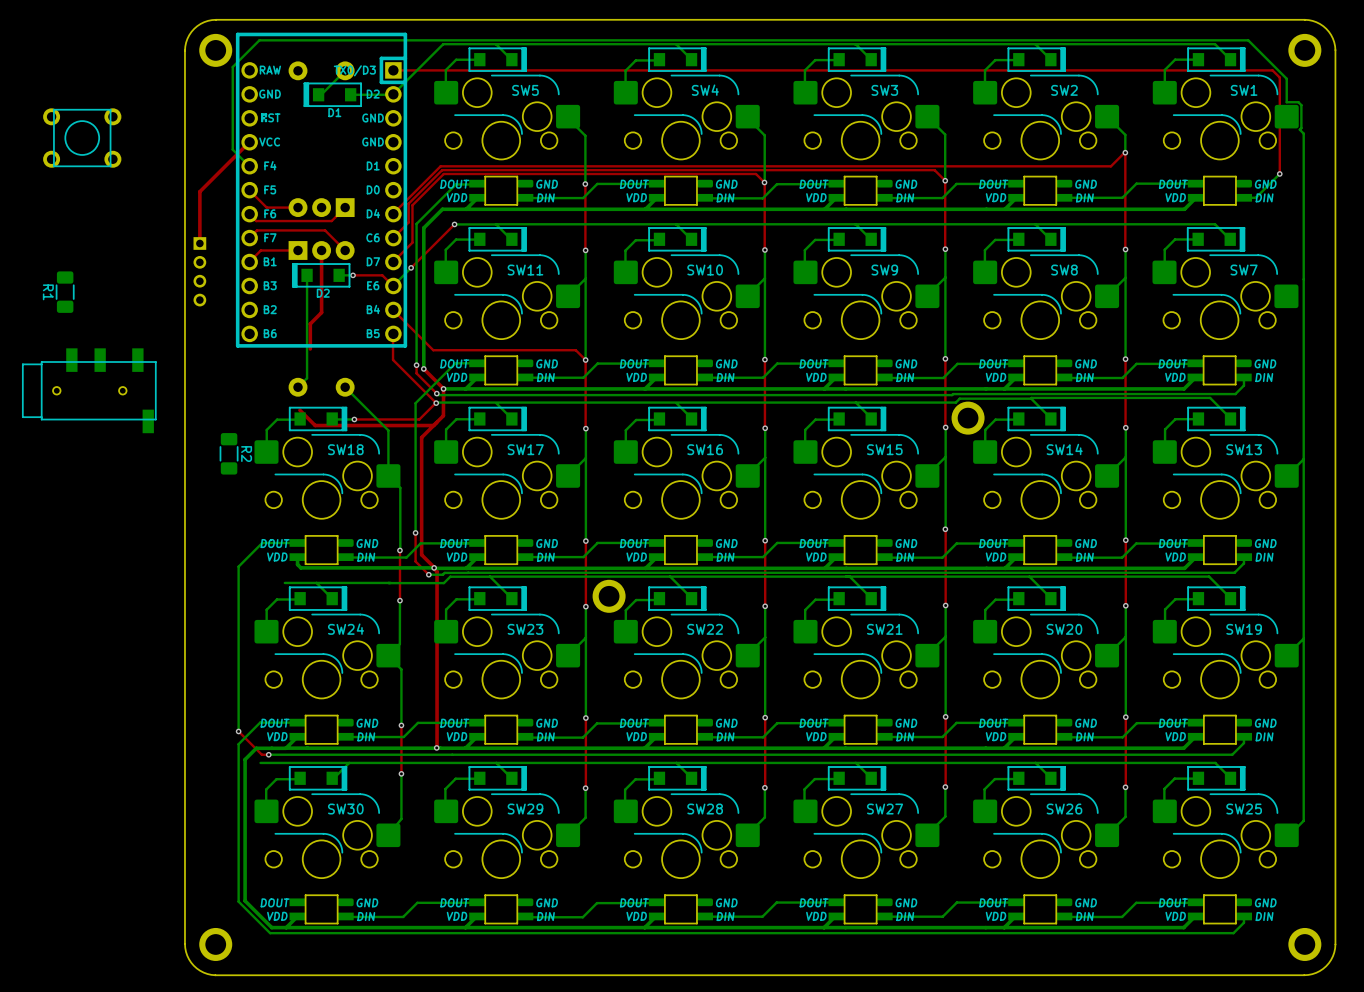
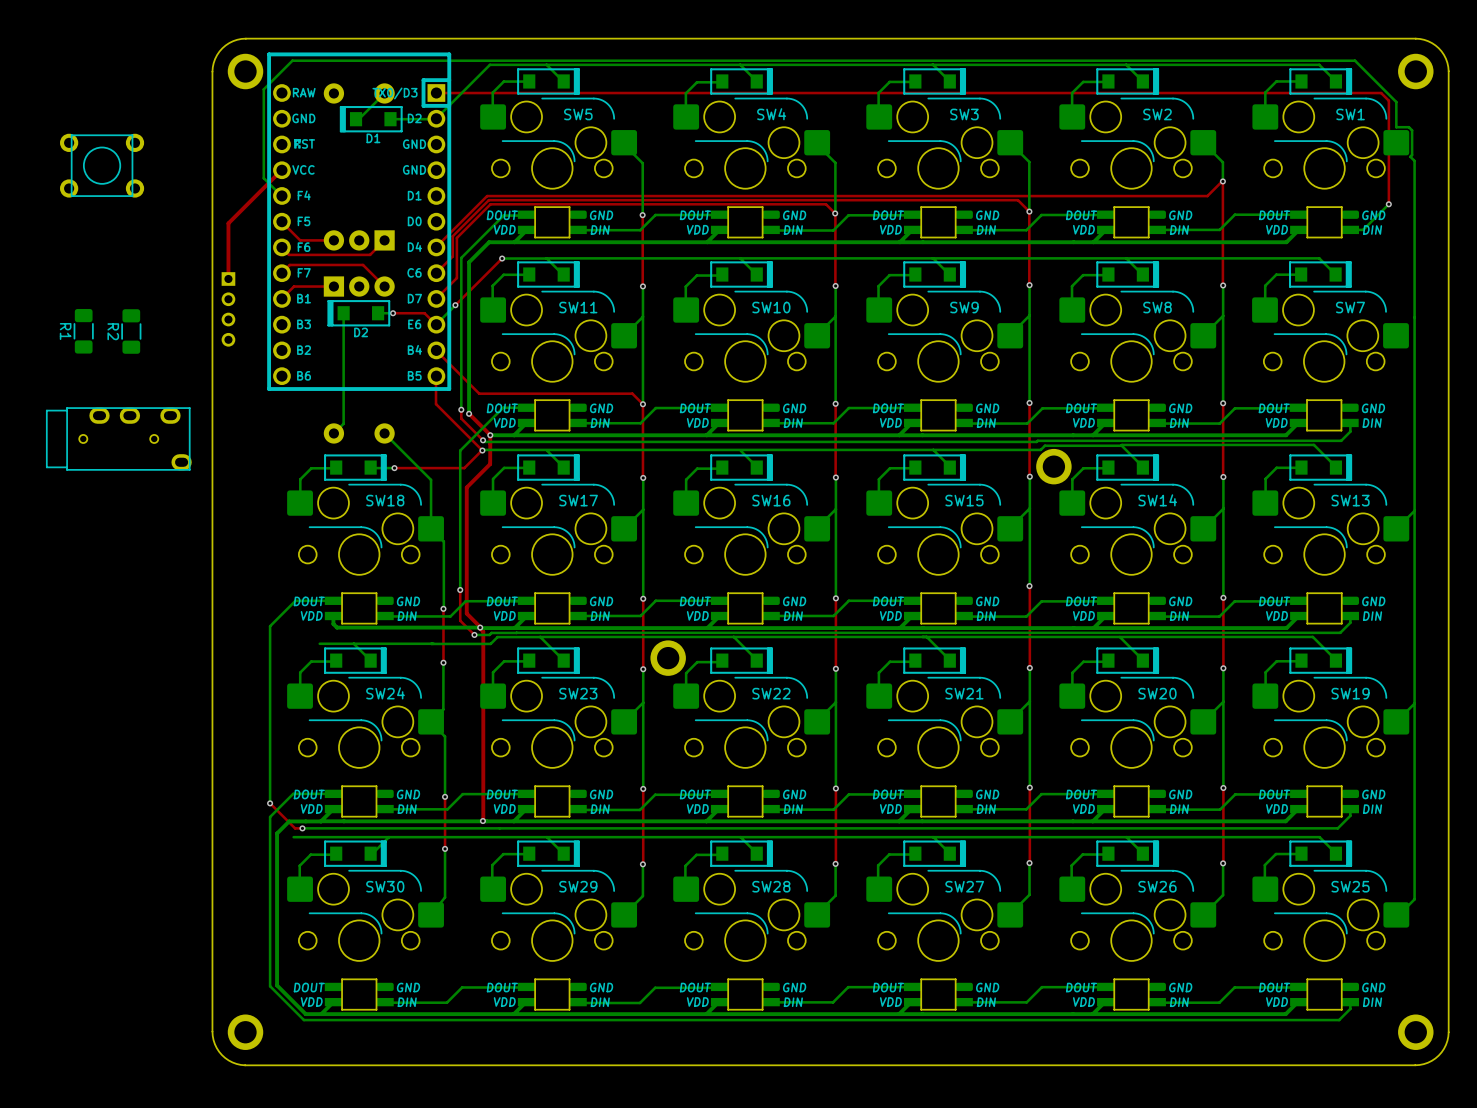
top track: (321, 250) (321, 312) (310, 323) (310, 348) -> none
part footprint: [22, 348, 157, 434] -> [46, 407, 192, 471]
top track: (299, 410) (315, 425) (433, 425) -> none
R2 position: (229, 453) -> (131, 331)
R2 name position: R2 (246, 454) -> R2 (113, 331)

